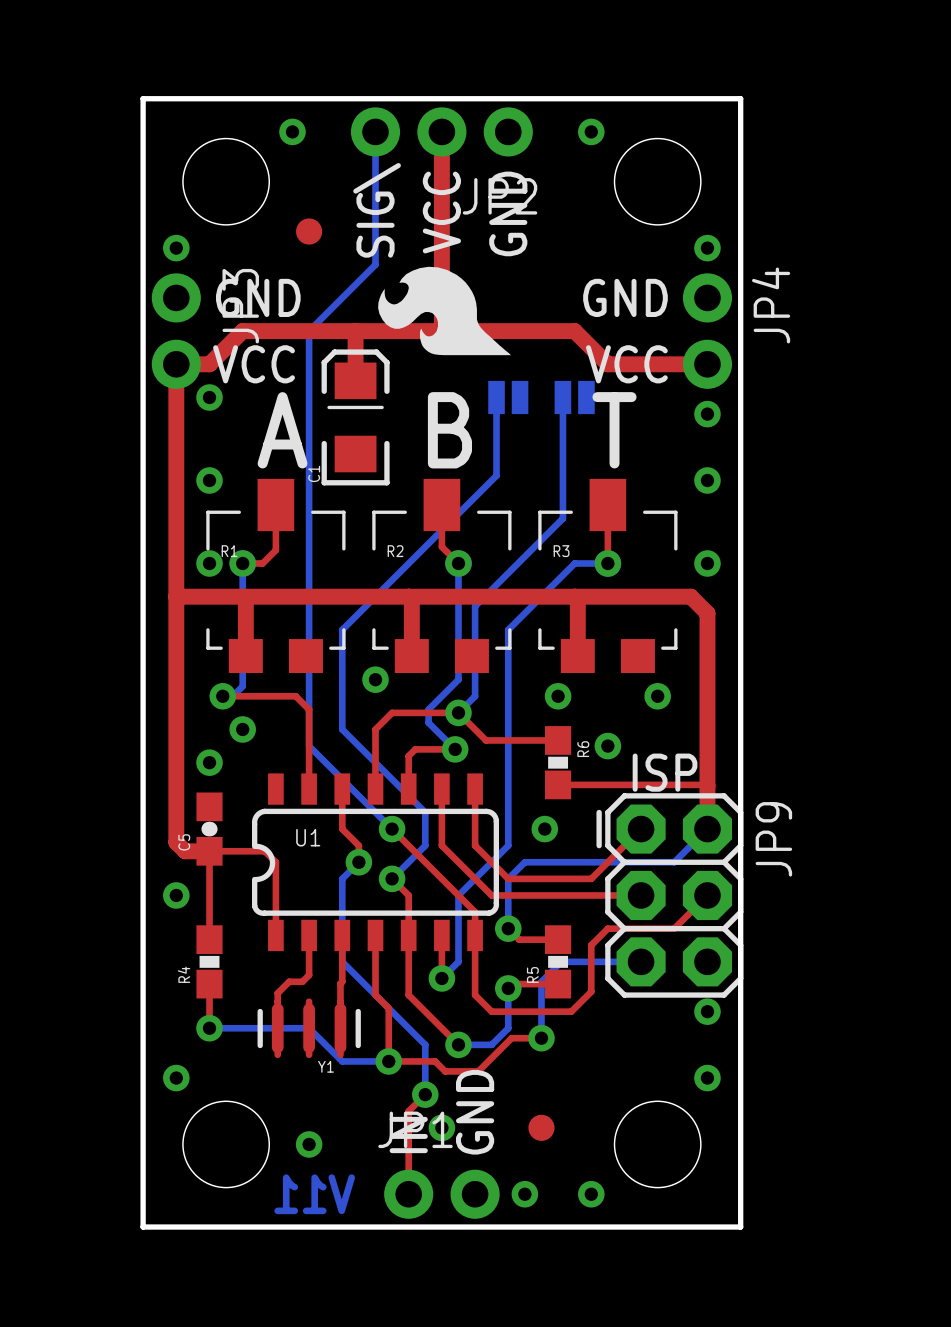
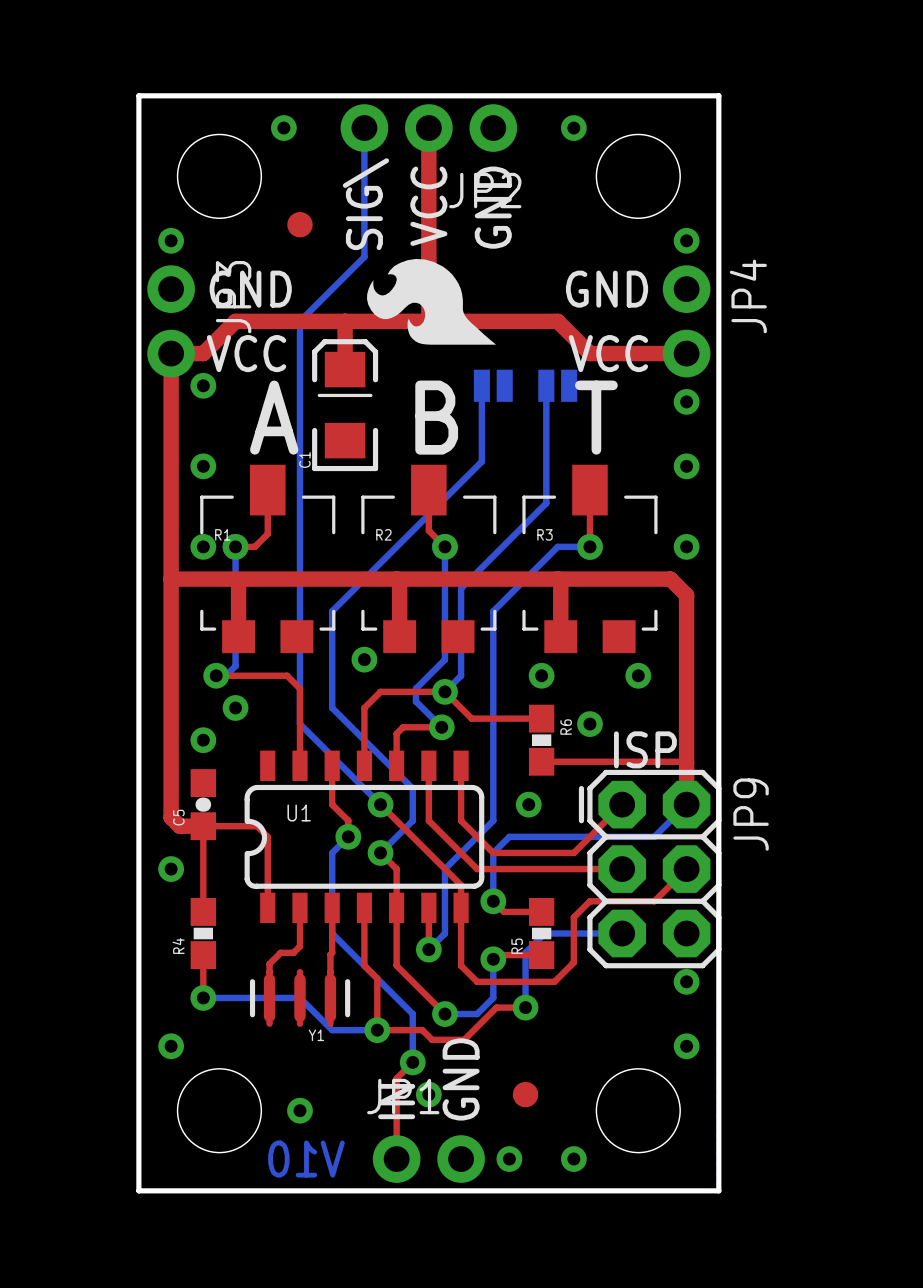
drawing shape: [274, 1174, 356, 1215] -> [268, 1140, 345, 1178]

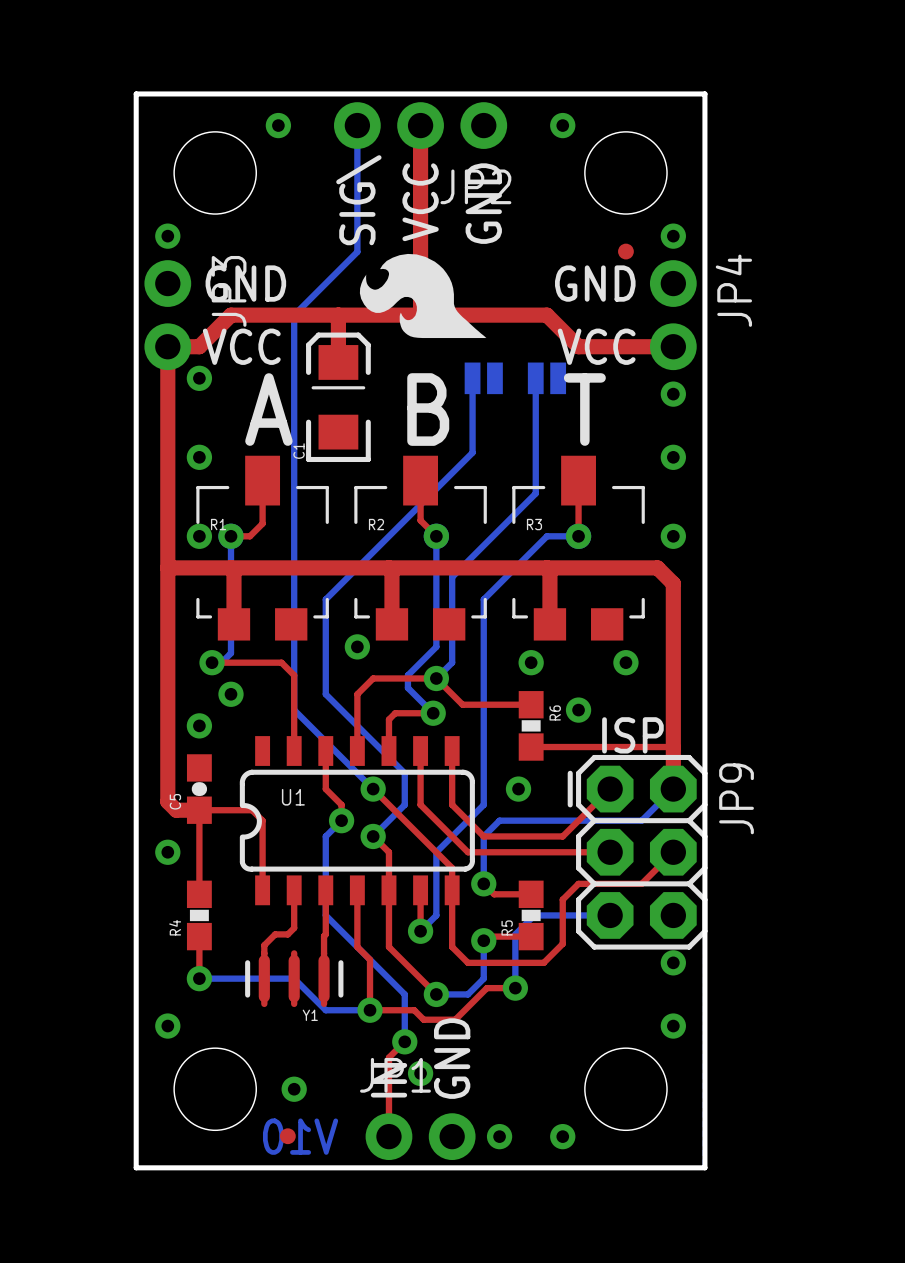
part: (299, 224) -> none
part: none -> (625, 251)
part: (525, 1094) -> none
part: none -> (287, 1136)

